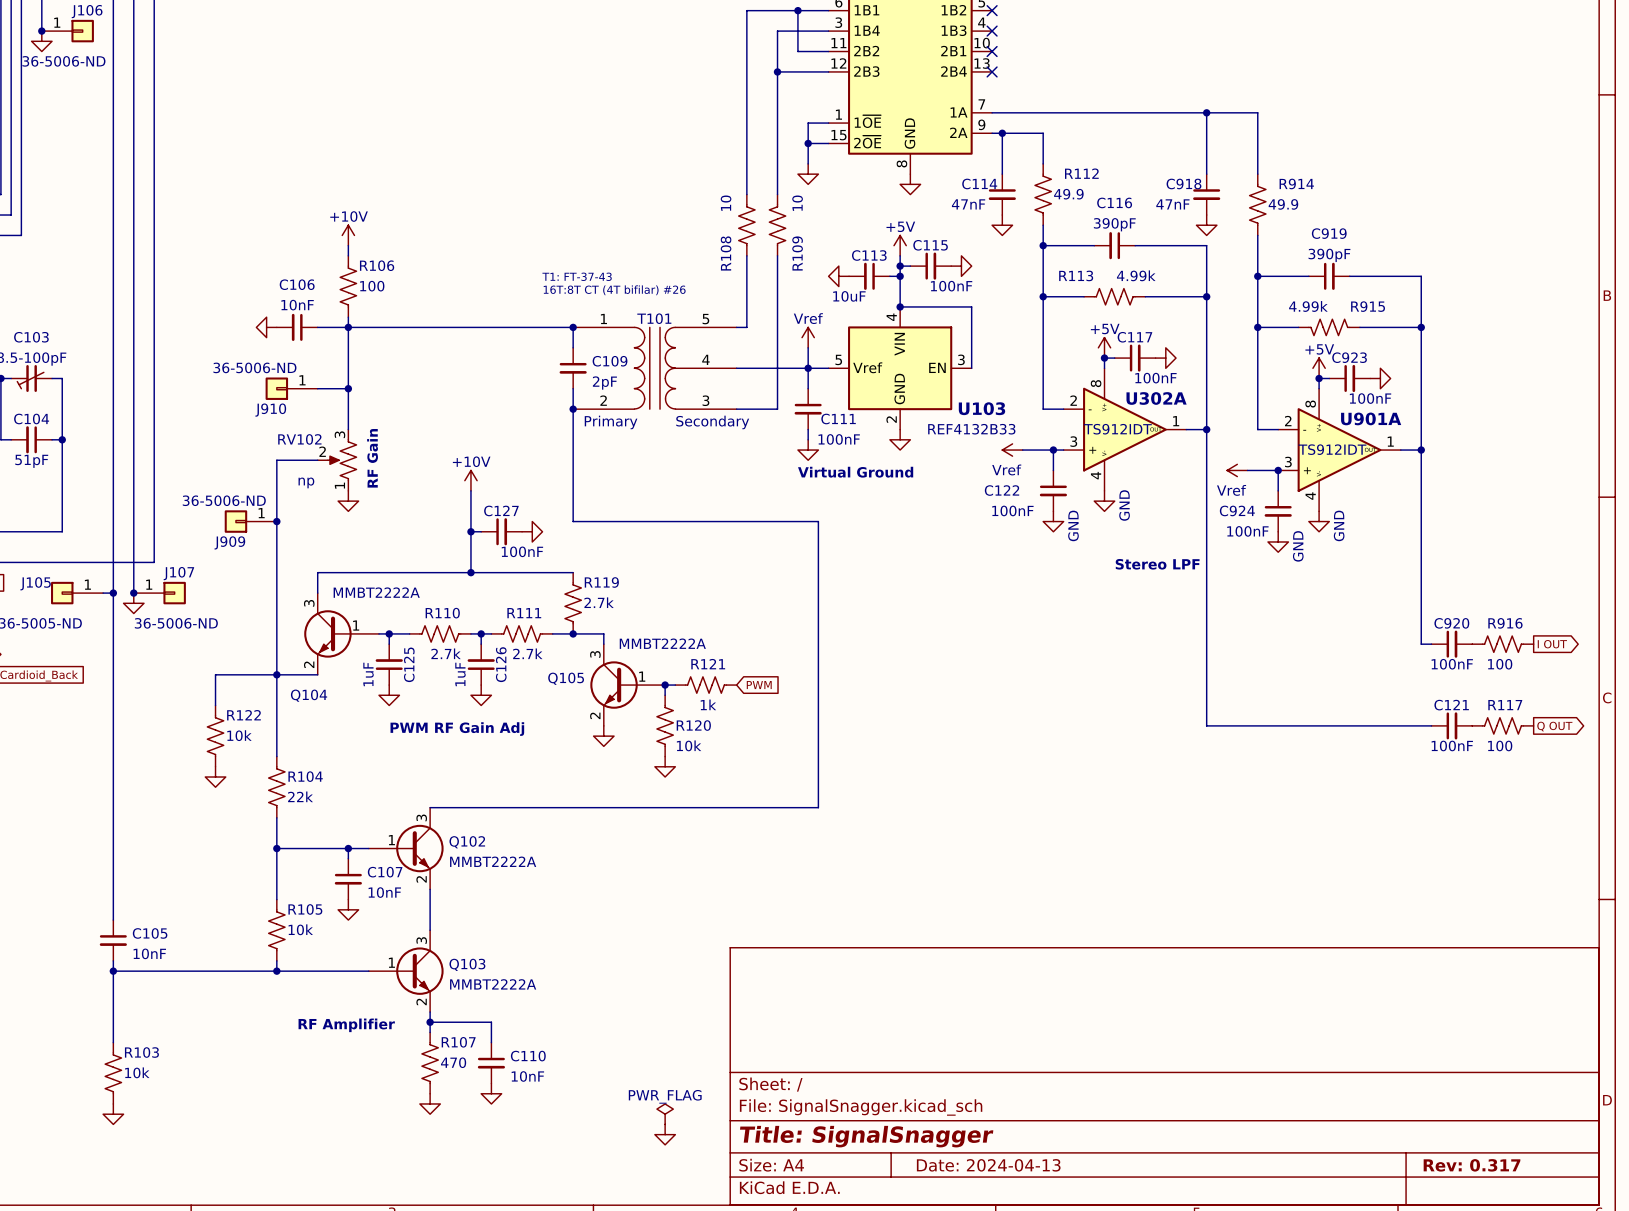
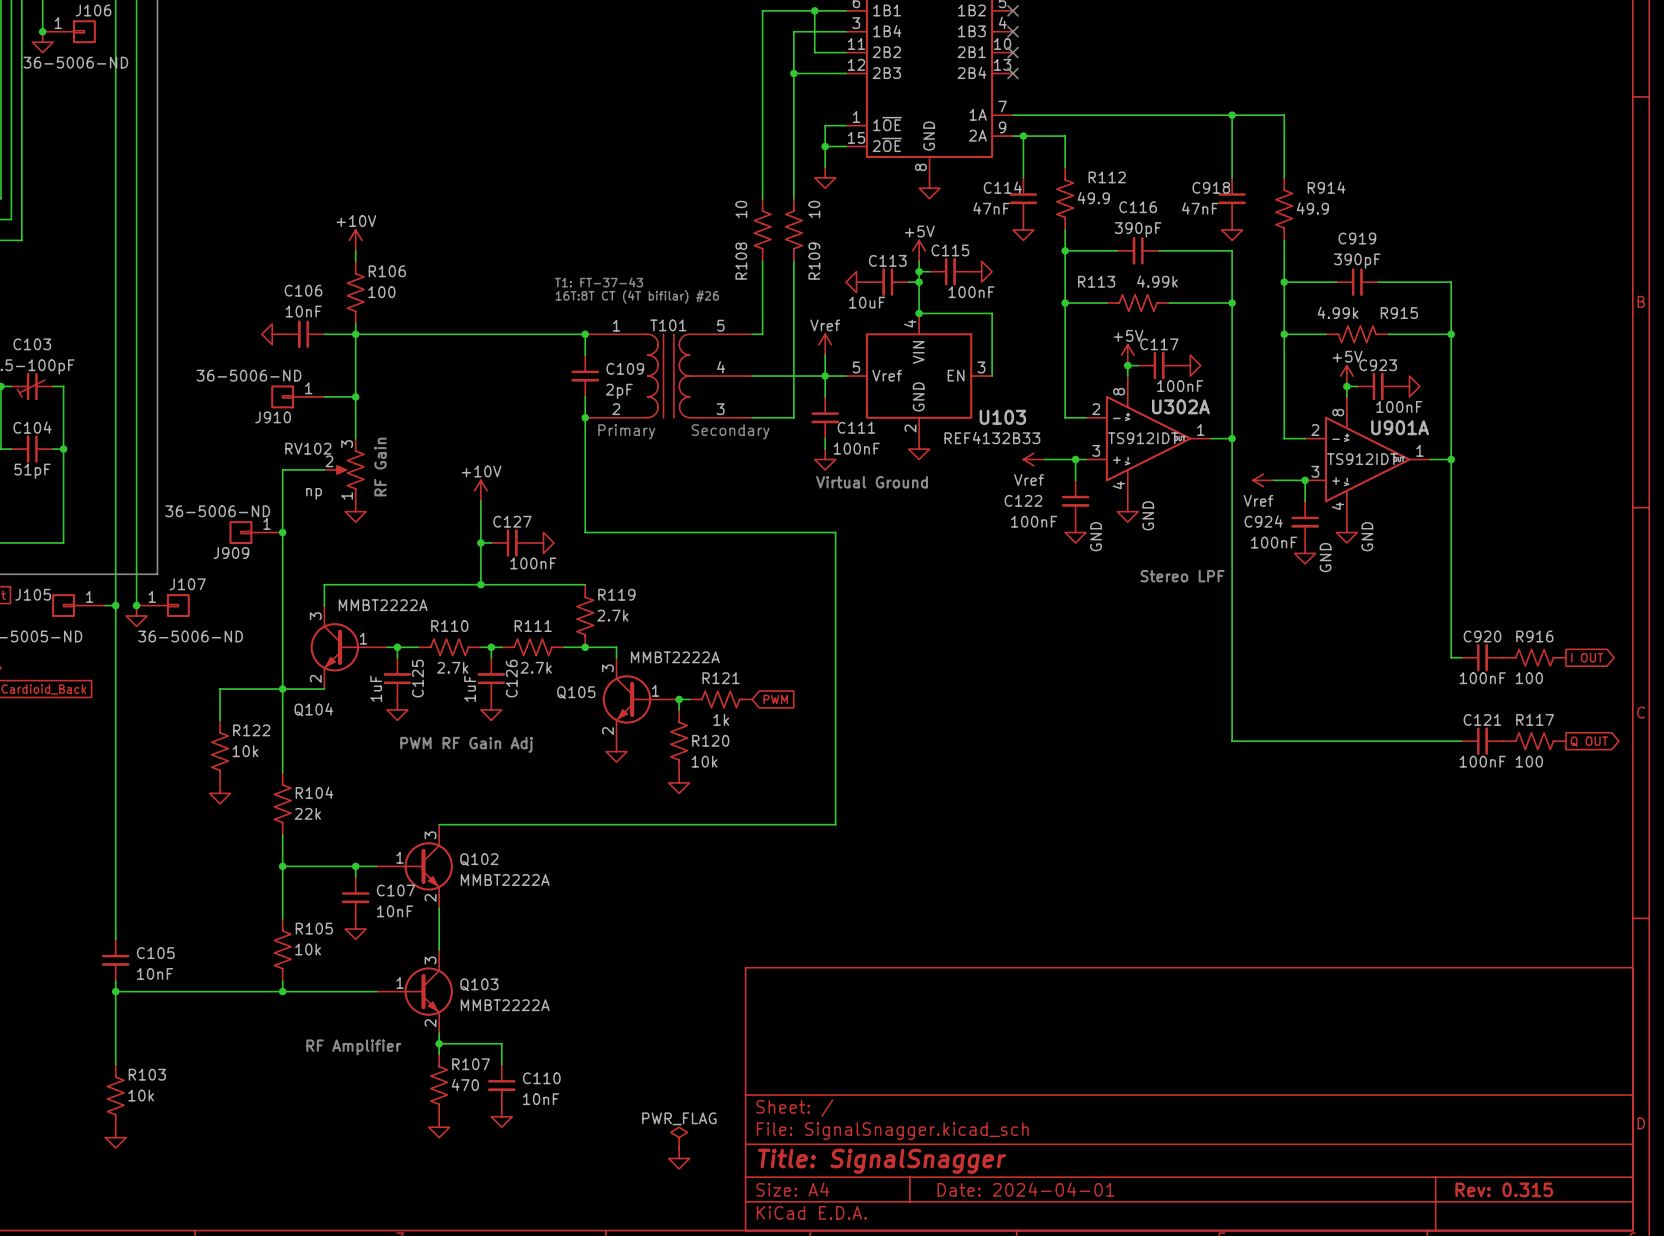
title block: Date: 2024-04-13 (988, 1165) -> Date: 2024-04-01 (1026, 1189)
title block: Rev: 0.317 (1472, 1165) -> Rev: 0.315 (1504, 1189)

